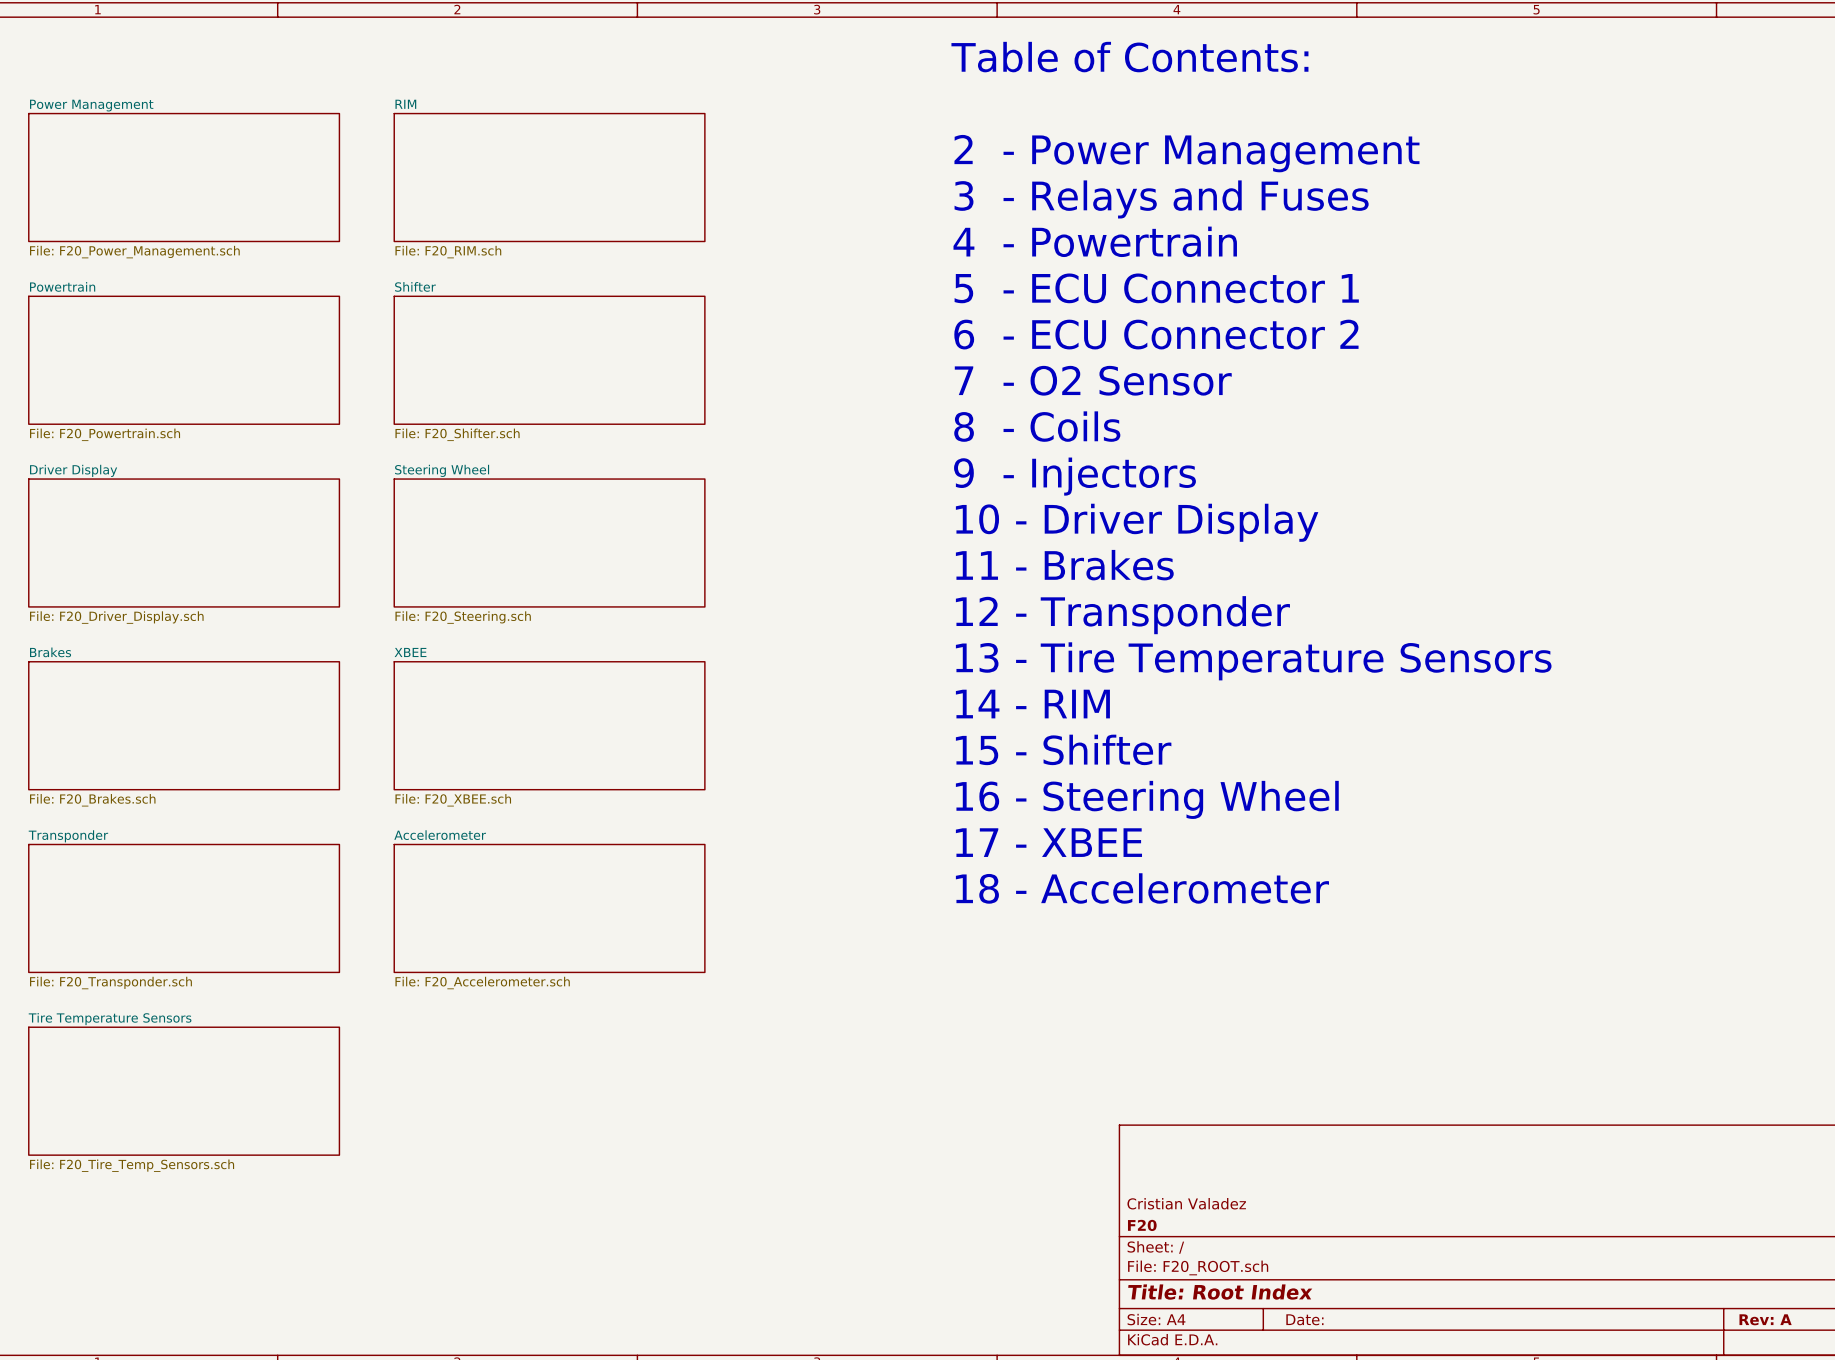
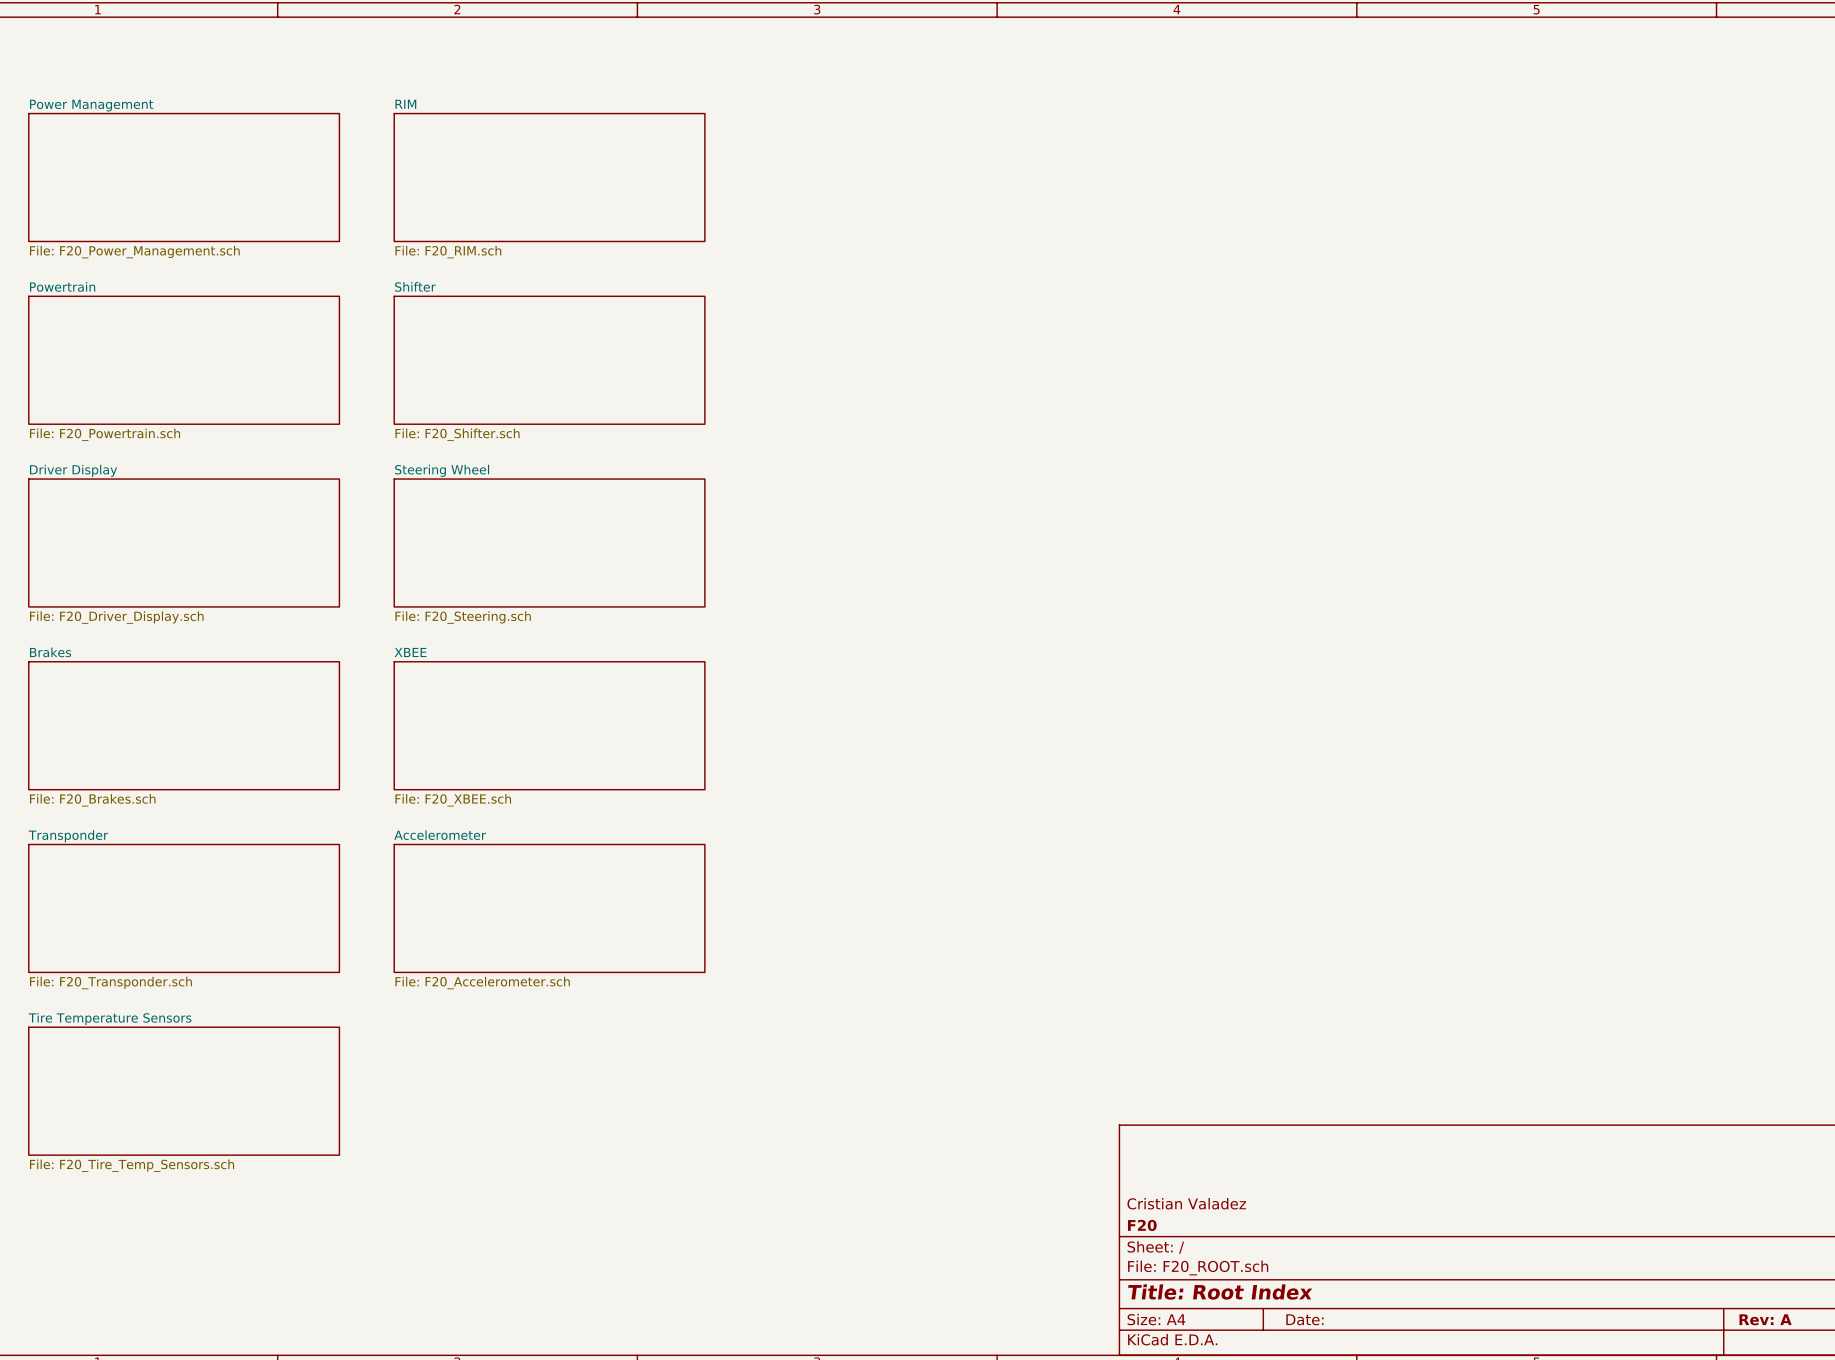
text: Table of Contents: (1129, 57) -> none
text: 2 - Power Management (1186, 153) -> none
text: 3 - Relays and Fuses (1161, 199) -> none
text: 4 - Powertrain (1095, 241) -> none
text: 5 - ECU Connector 1 (1156, 288) -> none
text: 6 - ECU Connector 2 (1156, 334) -> none
text: 7 - O2 Sensor (1093, 380) -> none
text: 8 - Coils (1037, 426) -> none
text: 9 - Injectors (1074, 476) -> none
text: 10 - Driver Display (1137, 522) -> none
text: 11 - Brakes (1064, 565) -> none
text: 12 - Transponder (1122, 615) -> none
text: 13 - Tire Temperature Sensors (1253, 661) -> none
text: 14 - RIM (1032, 704) -> none
text: 15 - Shifter (1063, 749) -> none
text: 16 - Steering Wheel (1147, 799) -> none
text: 17 - XBEE (1048, 842) -> none
text: 18 - Accelerometer (1142, 888) -> none

